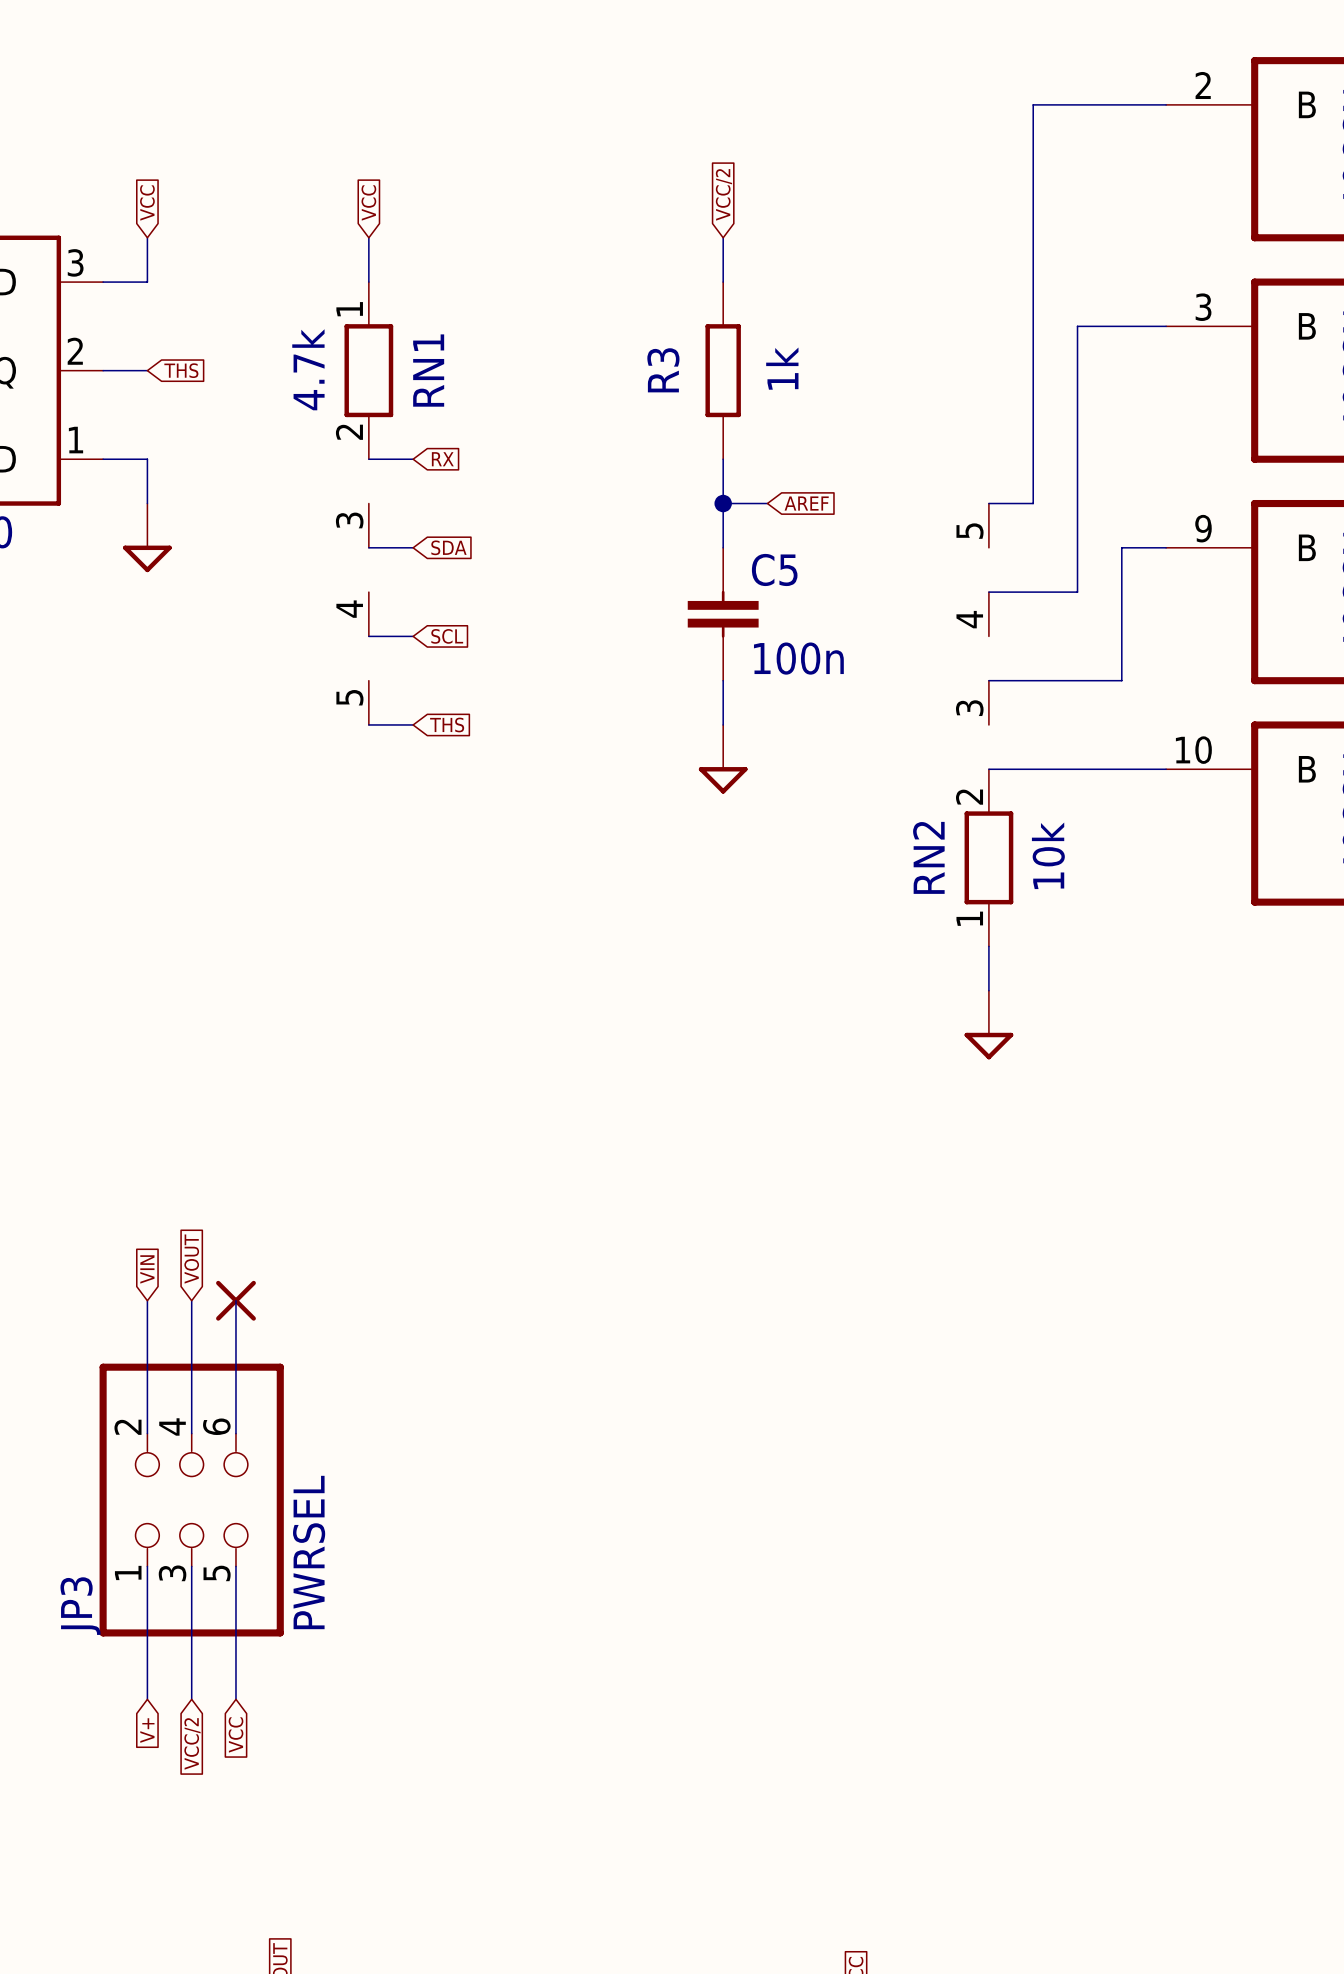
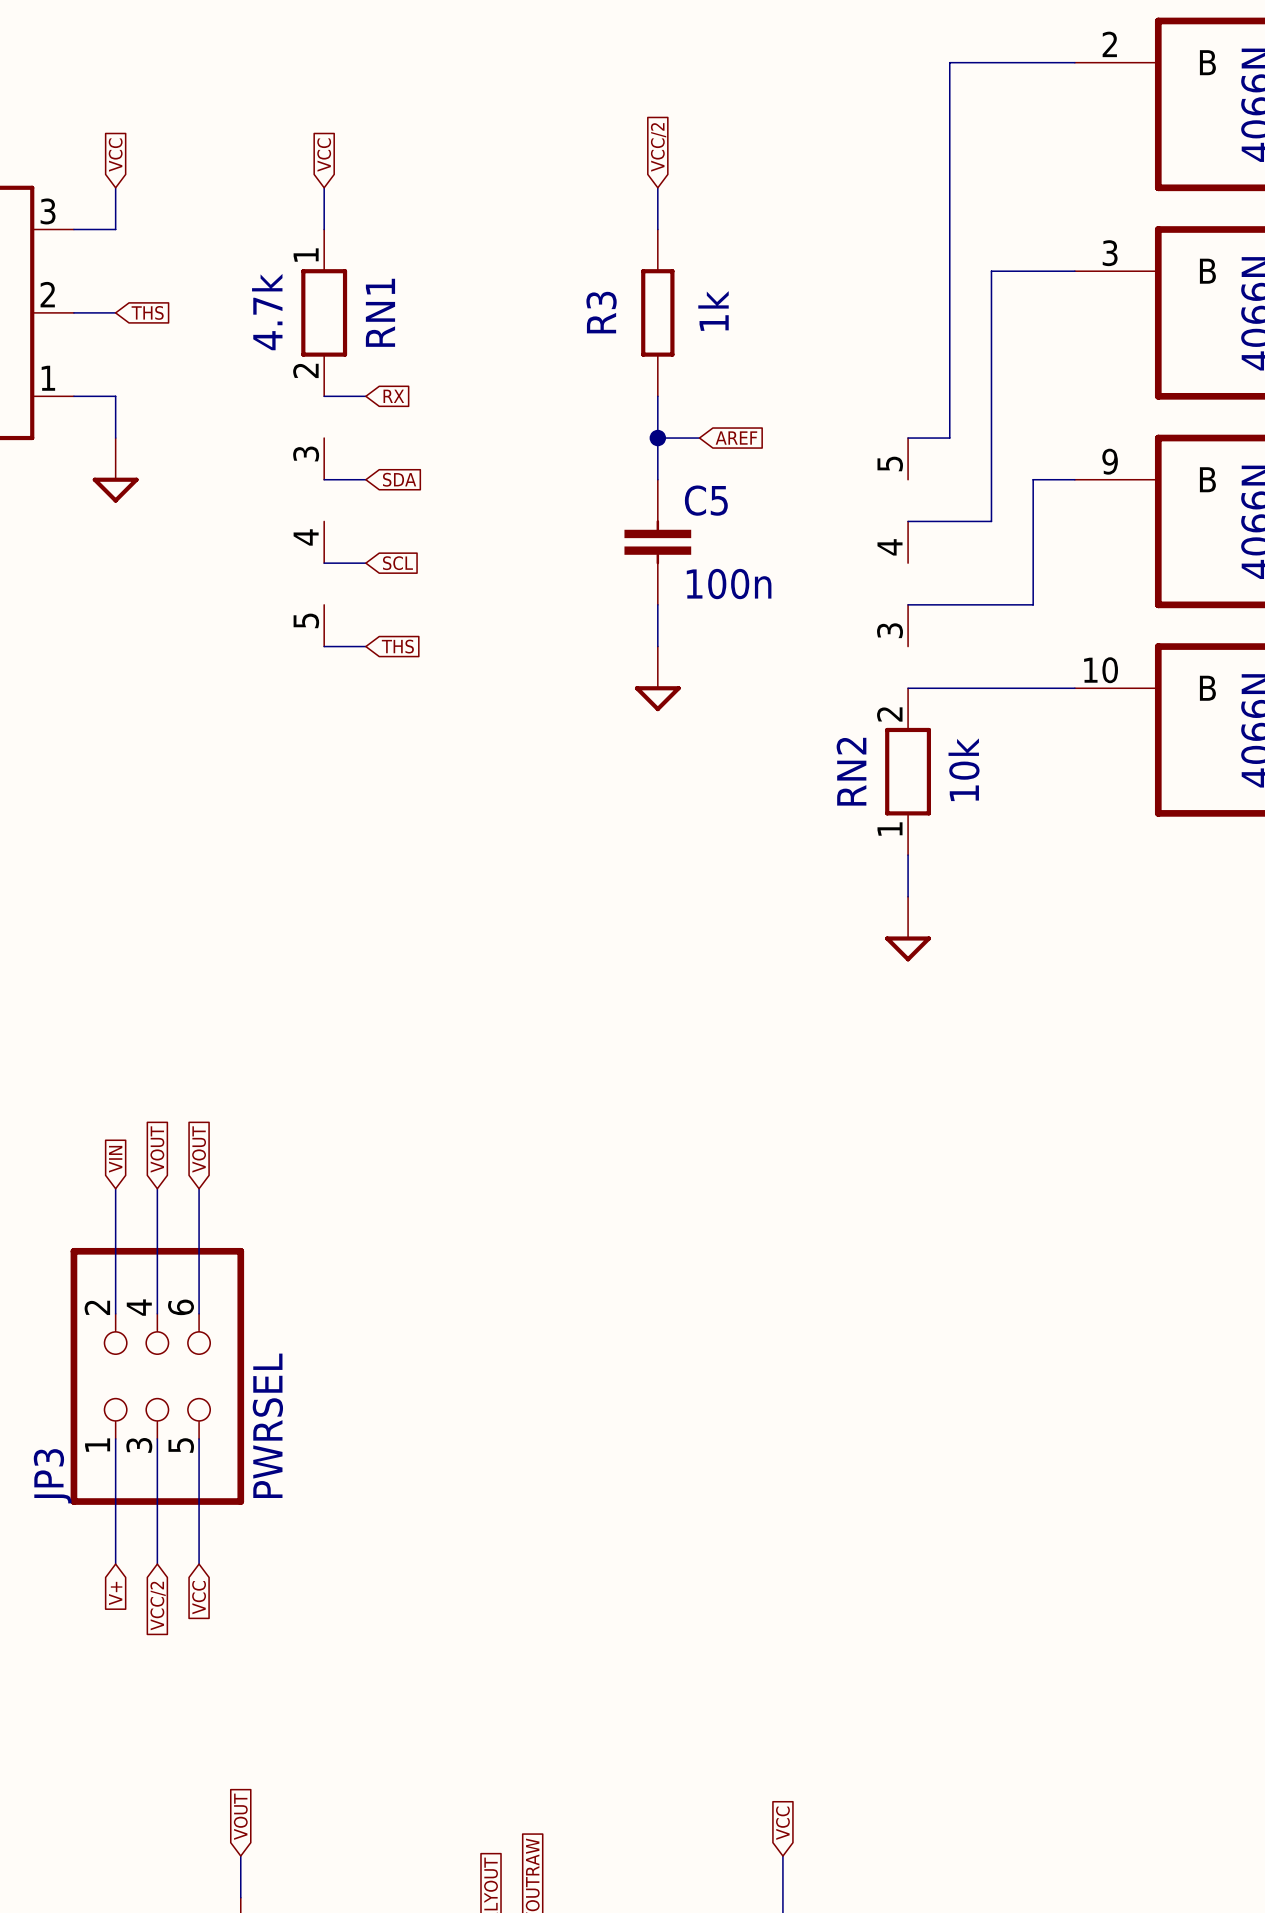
global label: none -> VOUT (199, 1149)
part: (235, 1300) -> none

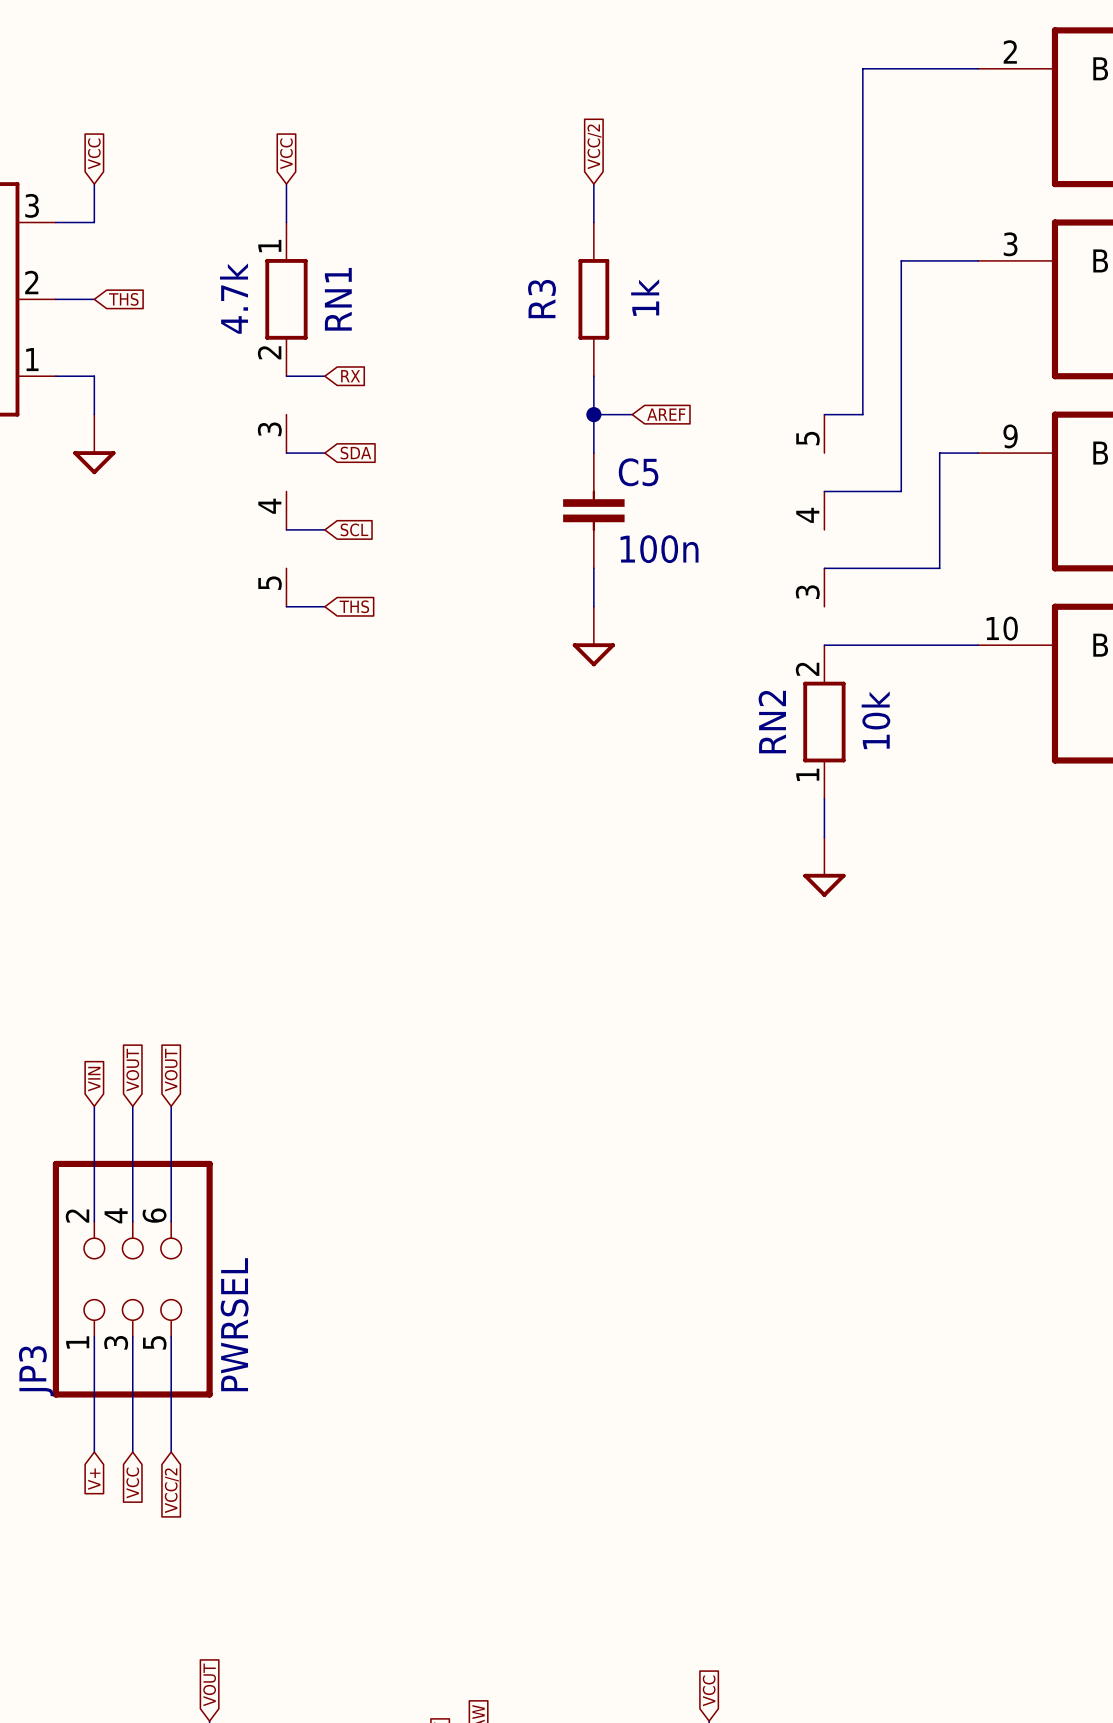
global label: VCC (199, 1597) -> VCC/2 (171, 1490)
global label: VCC/2 (158, 1606) -> VCC (132, 1483)

